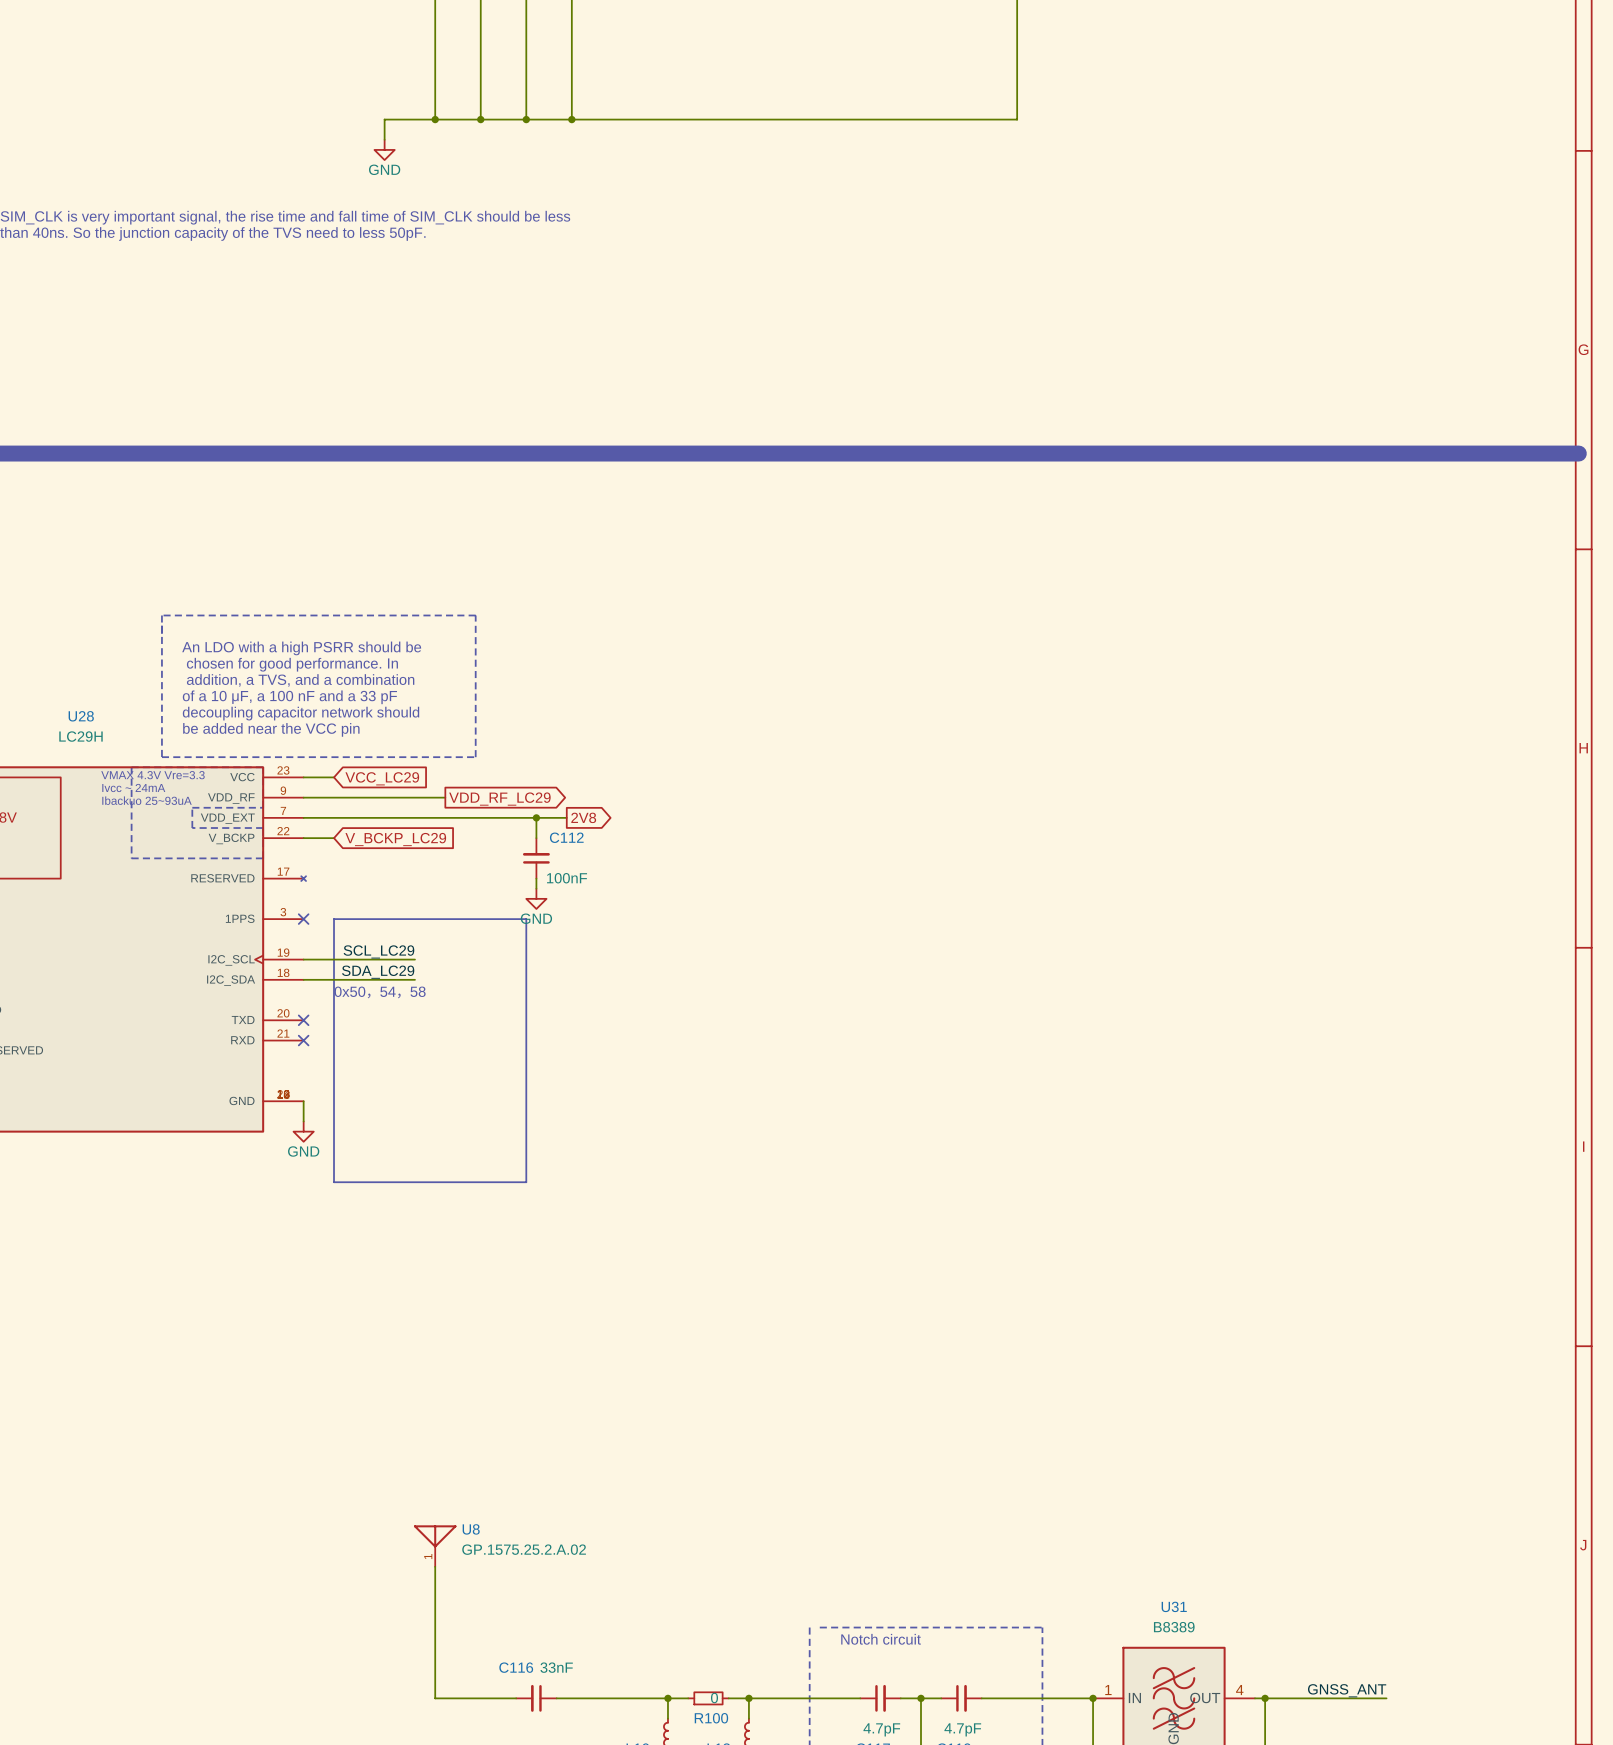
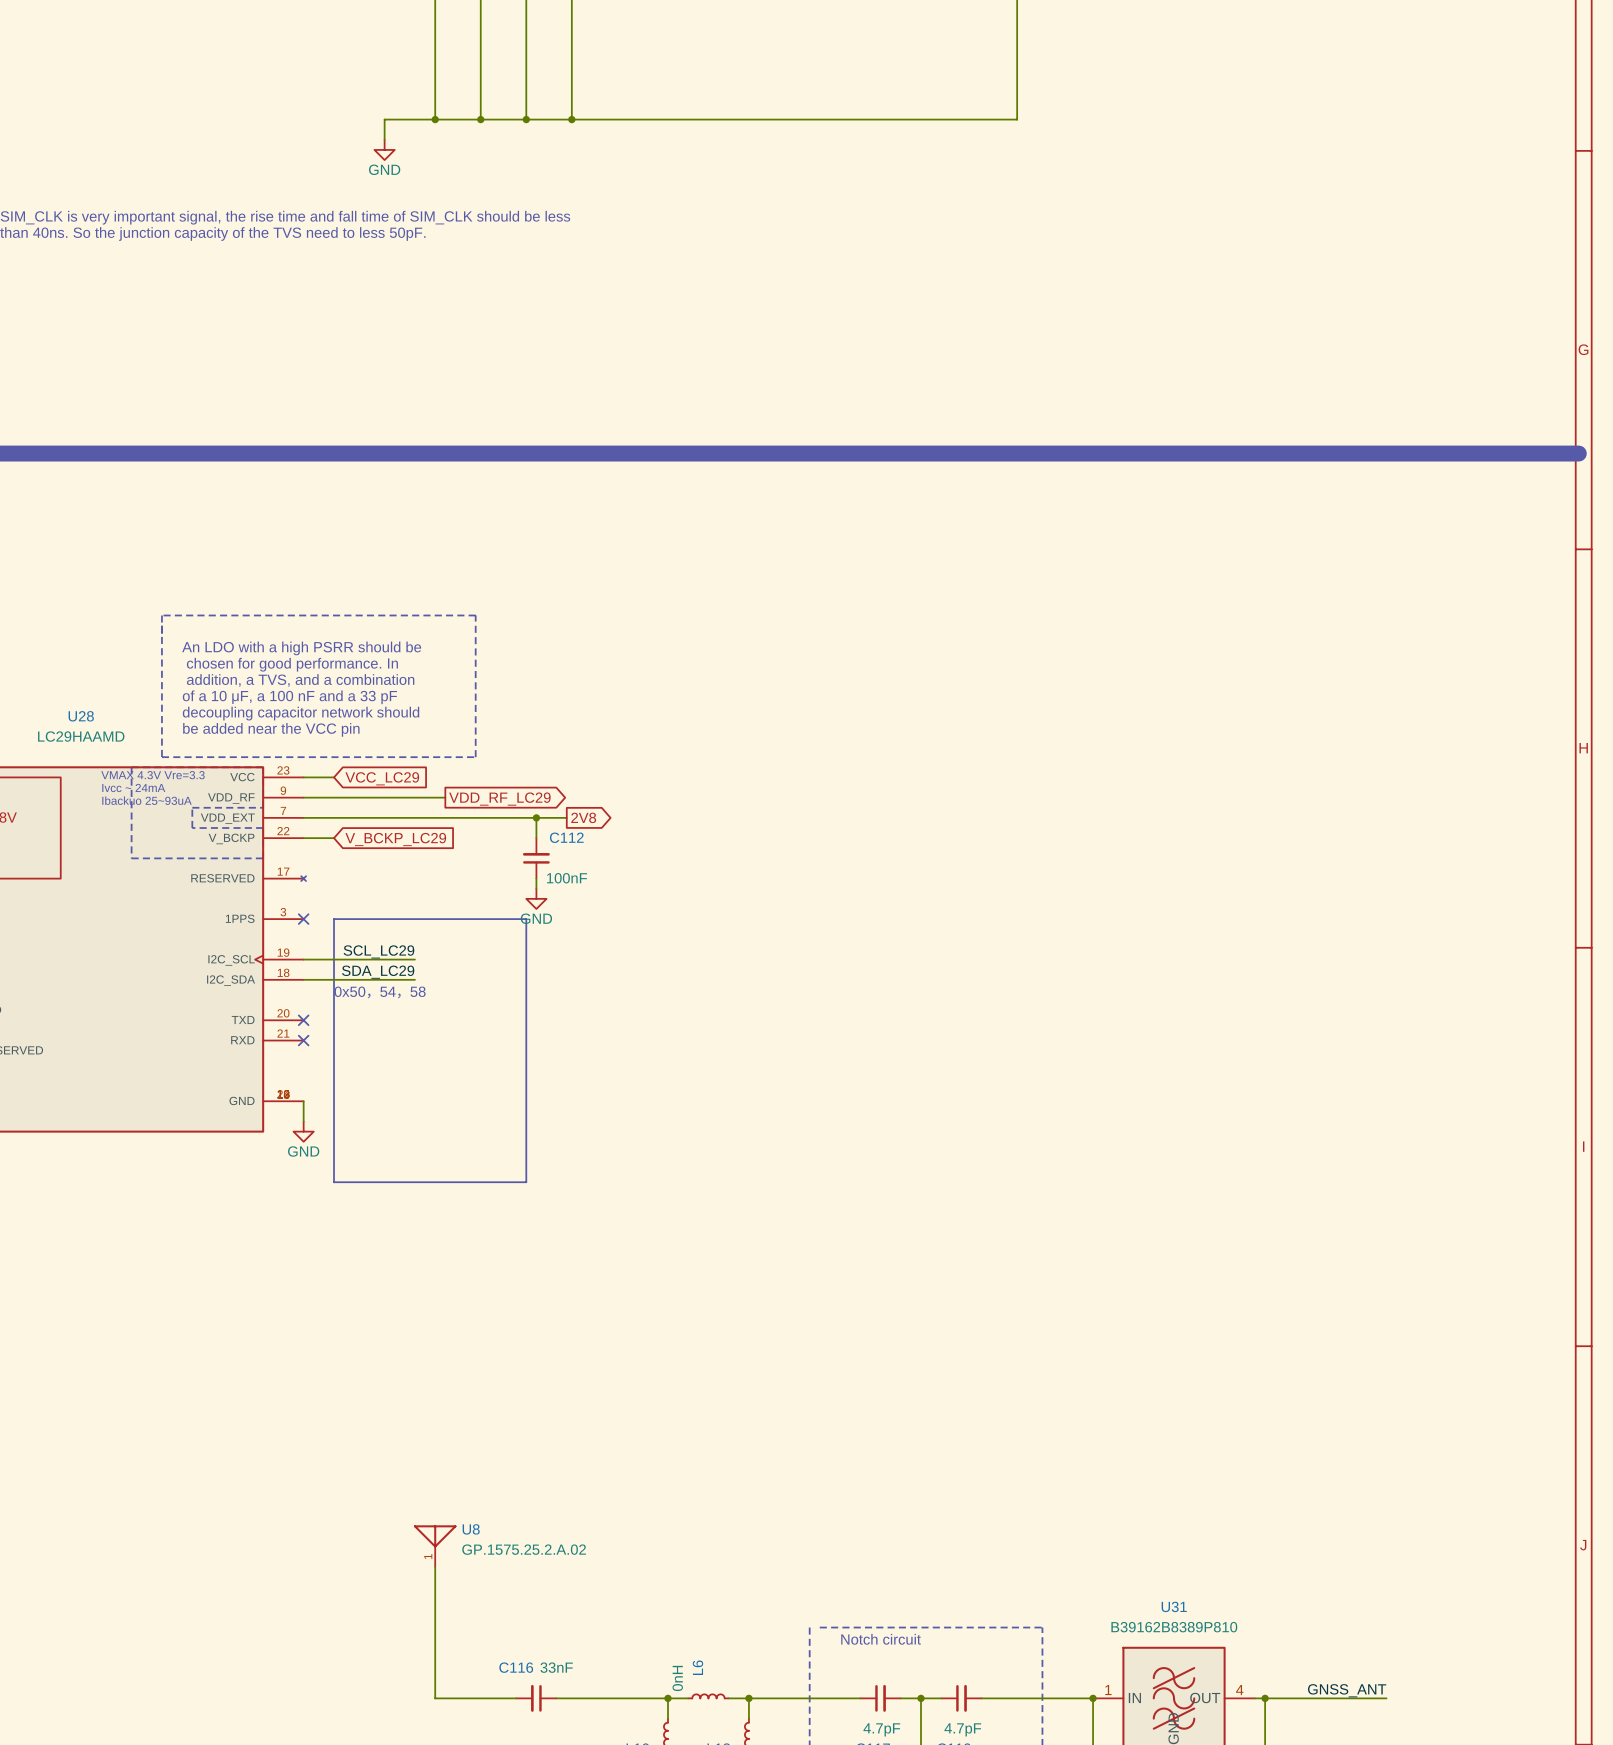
U28 value: LC29H (80, 736) -> LC29HAAMD (81, 736)
U31 value: B8389 (1174, 1627) -> B39162B8389P810 (1174, 1627)
L6: none -> 0nH (708, 1696)
R100: 0 (708, 1698) -> none

